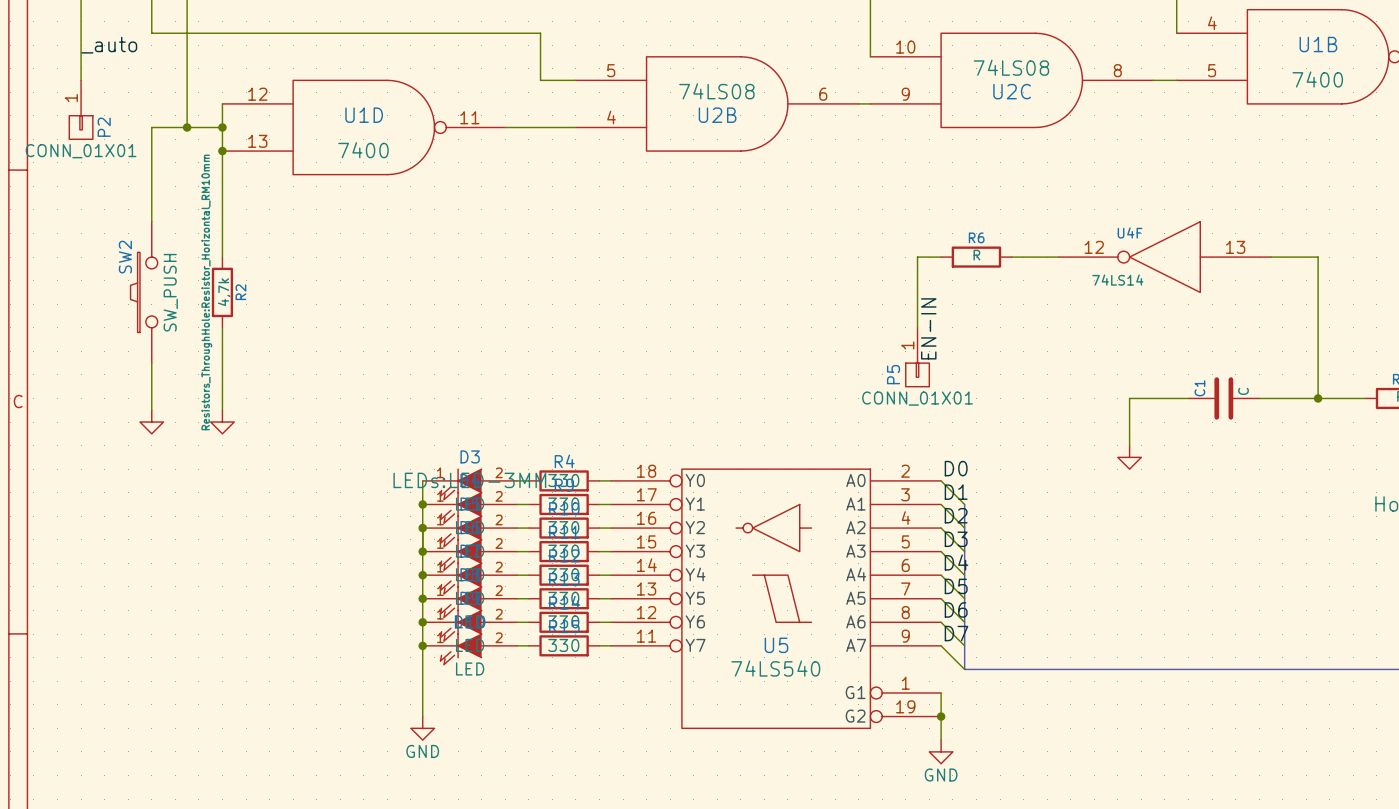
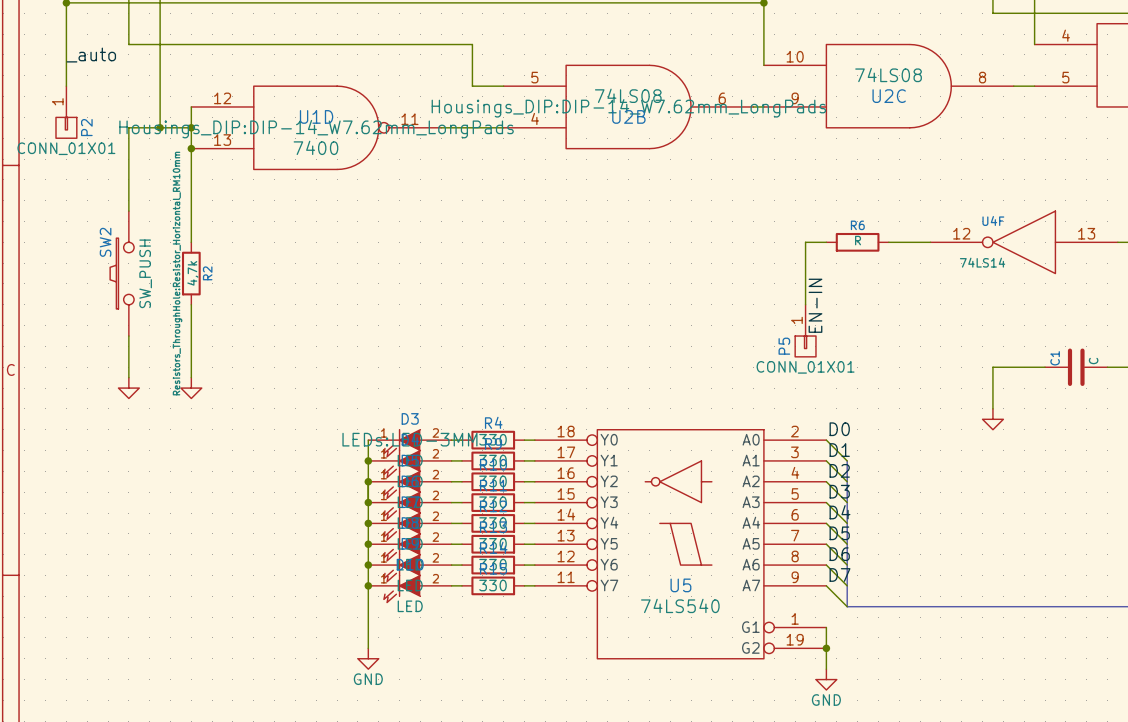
U2B text: none -> Housings_DIP:DIP-14_W7.62mm_LongPads (628, 108)
U1D text: none -> Housings_DIP:DIP-14_W7.62mm_LongPads (316, 129)

